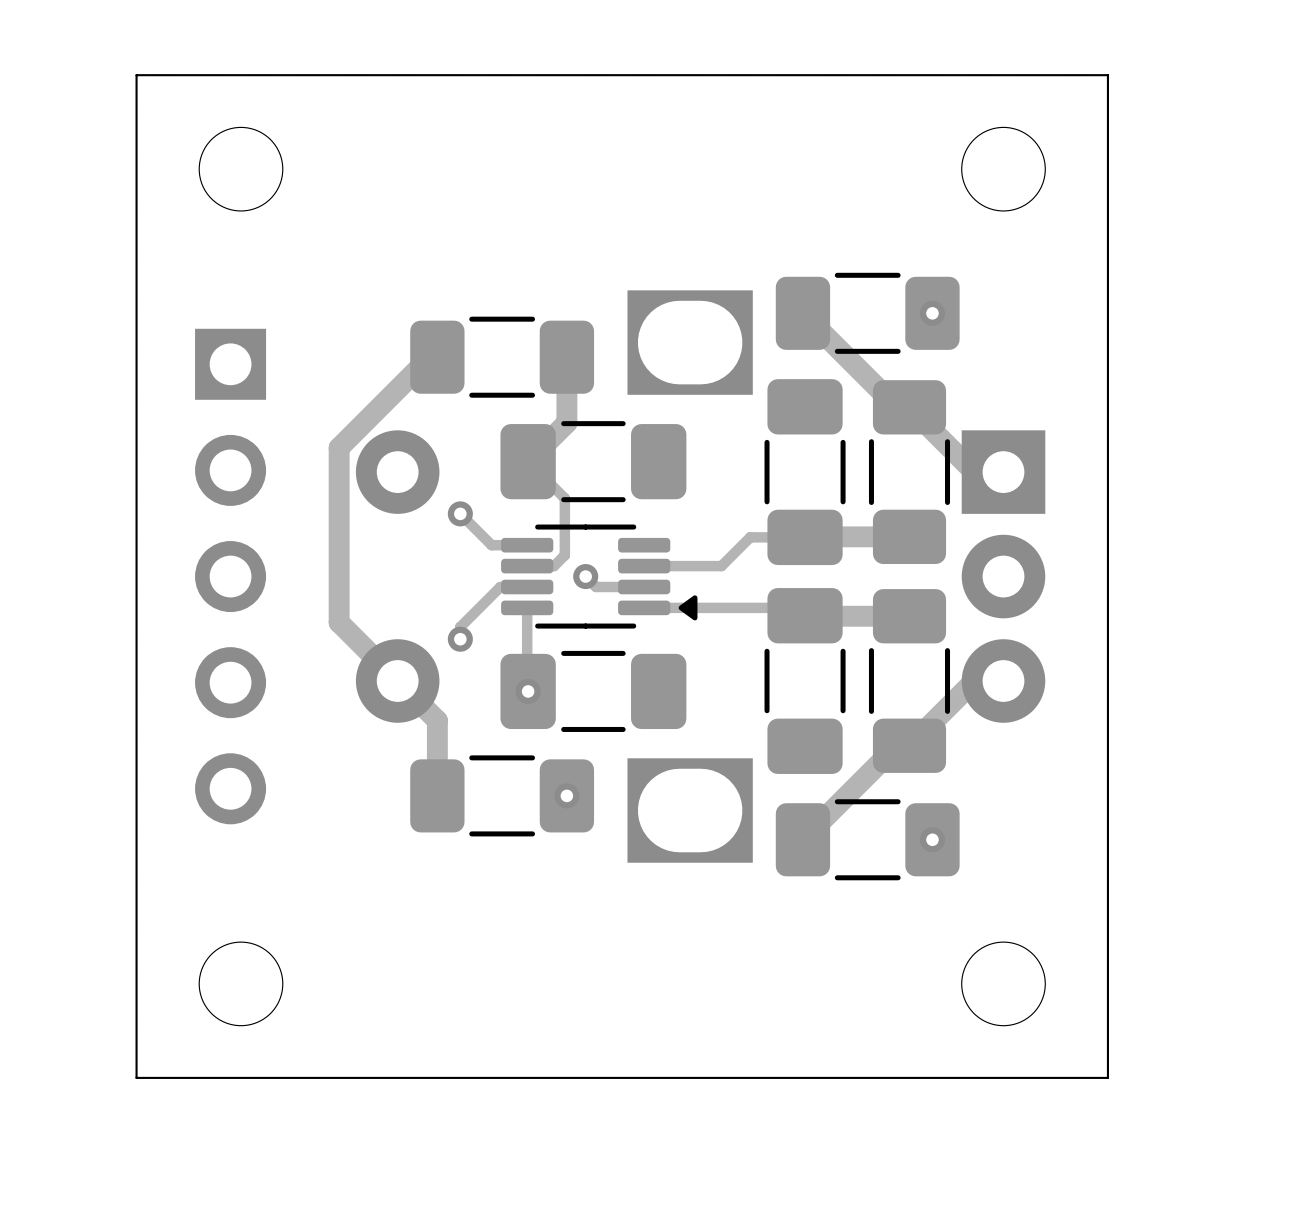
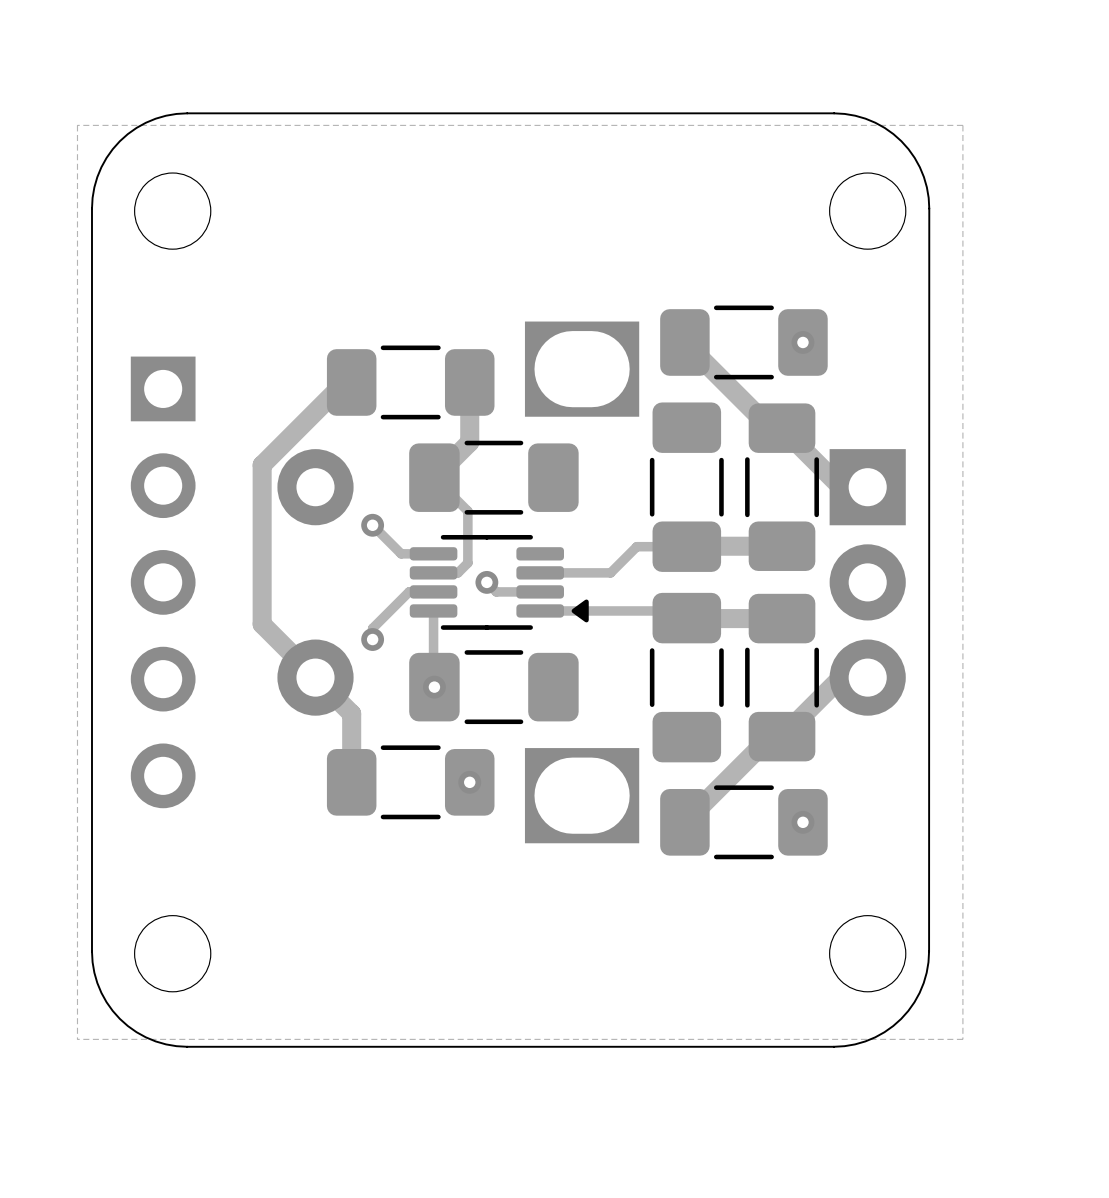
board edge: (1107, 75) (136, 75) (136, 1077) (1107, 1077) (1107, 75) -> (834, 113) (855, 115) (875, 122) (901, 141) (919, 167) (928, 197) (929, 951) (923, 983) (908, 1010) (893, 1026) (875, 1037) (855, 1044) (833, 1046) (187, 1046) (155, 1041) (127, 1026) (112, 1010) (101, 992) (94, 972) (91, 951) (91, 208) (97, 177) (112, 149) (127, 134) (145, 122) (166, 115) (187, 113) (834, 113)

